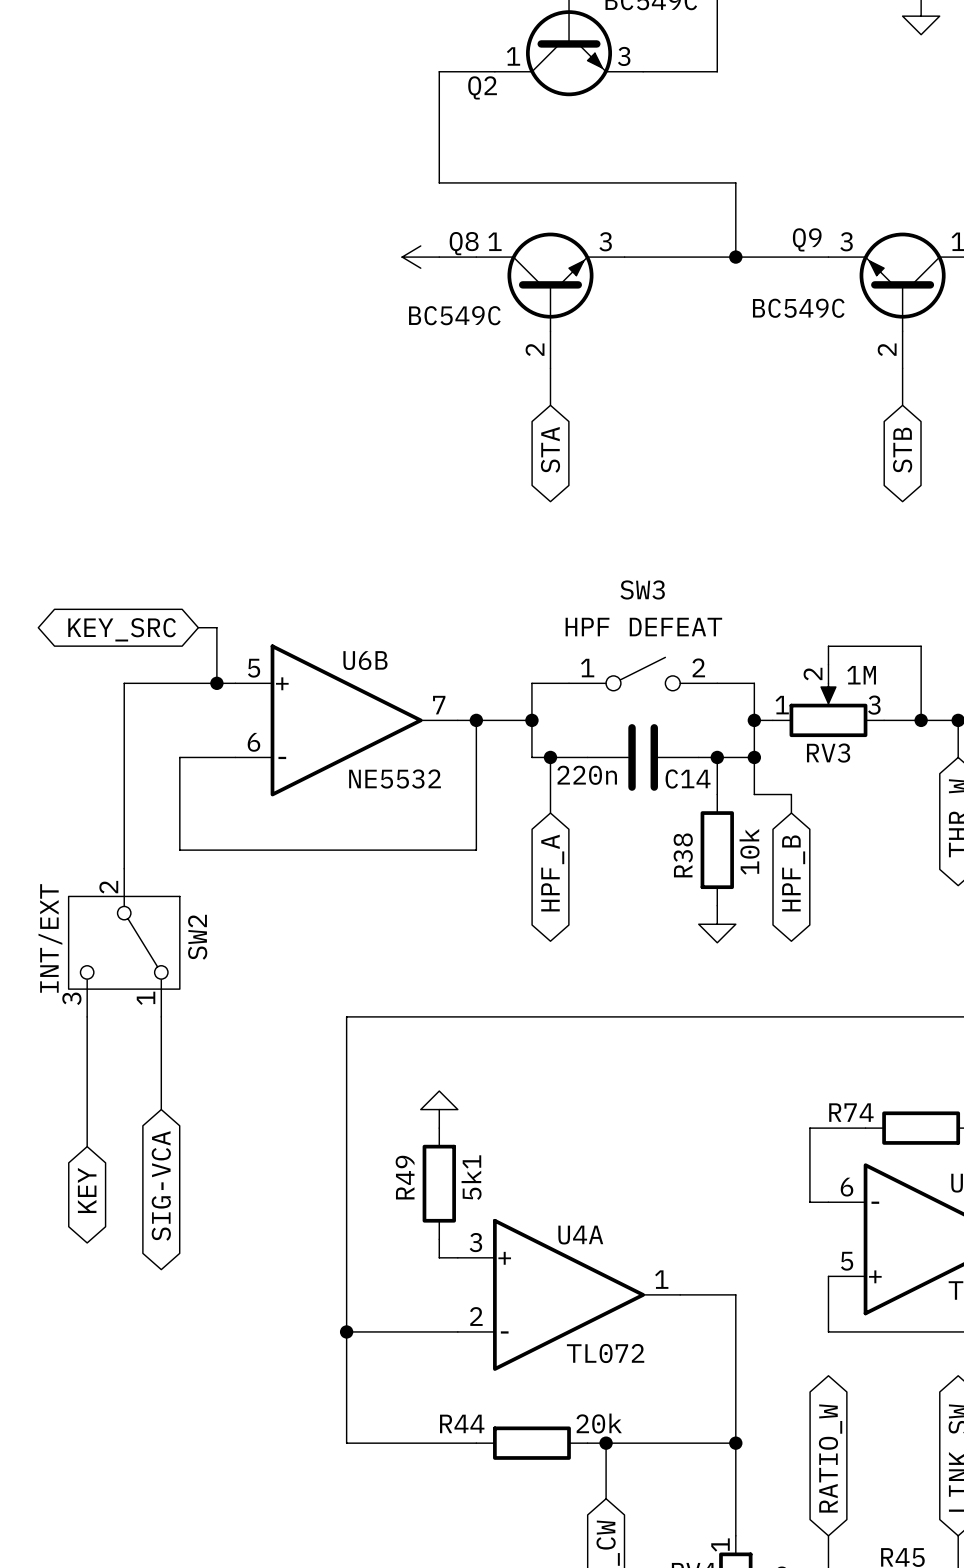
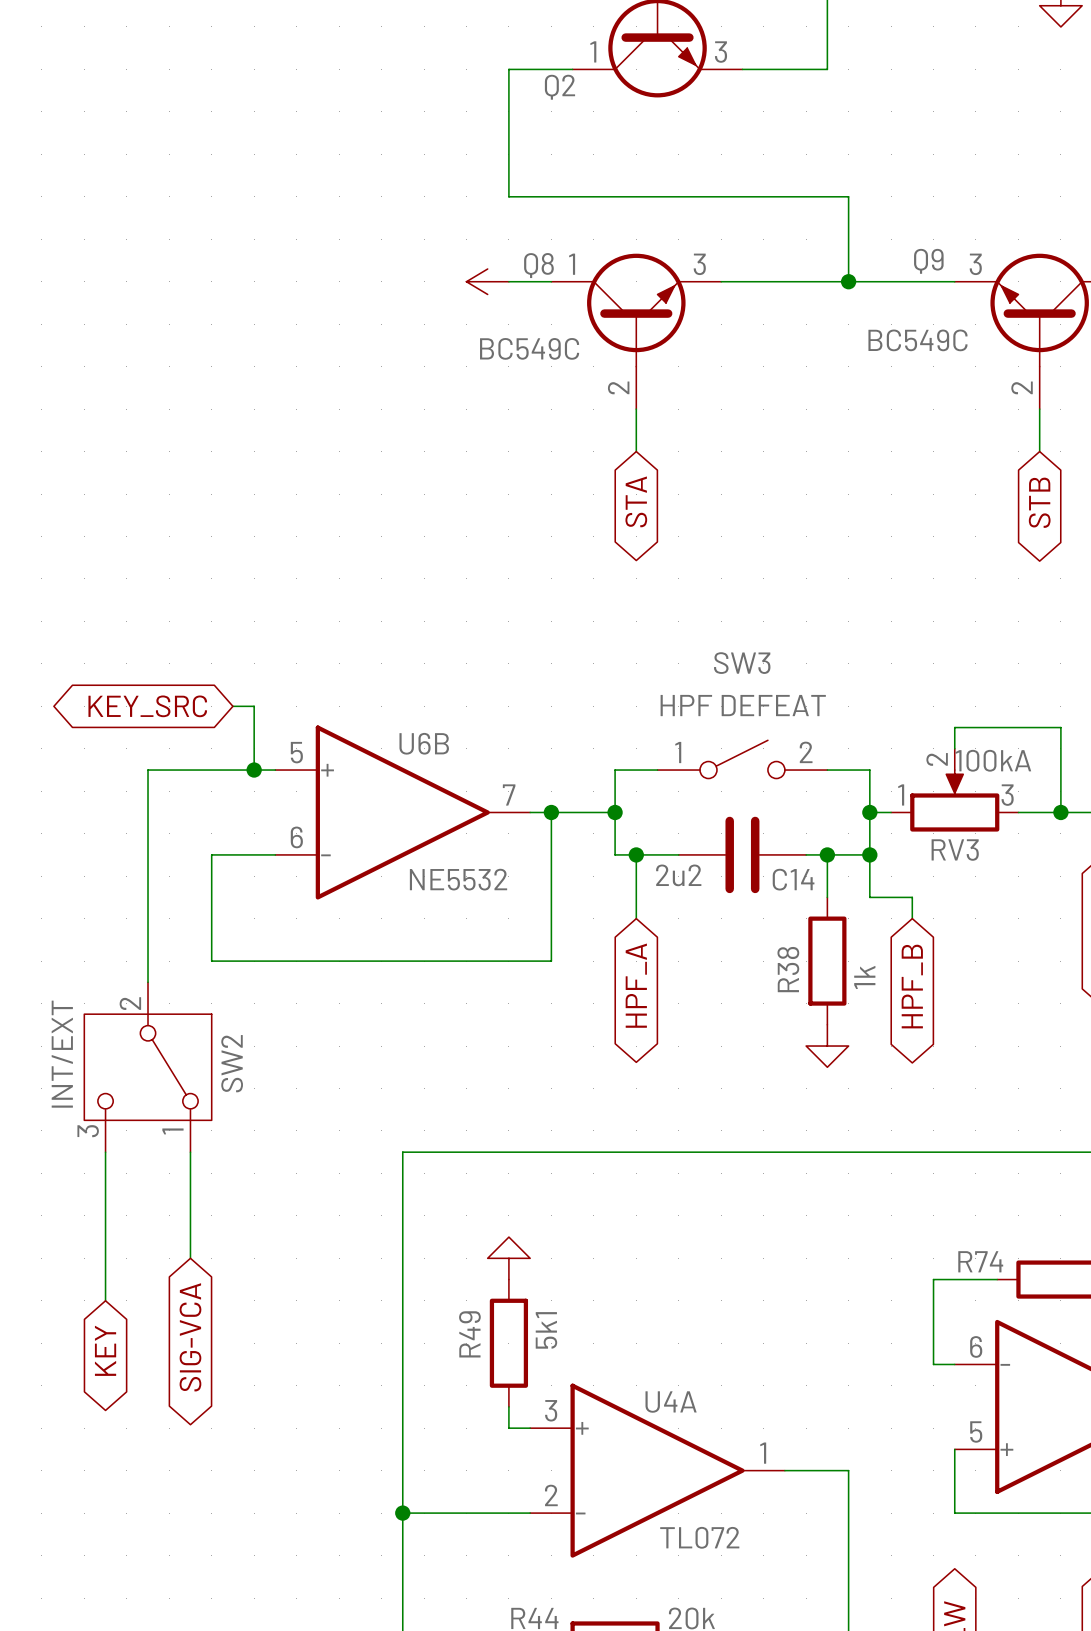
RV3 value: 1M (861, 675) -> 100kA (993, 760)
C14 value: 220n (587, 775) -> 2u2 (678, 875)
R38 value: 10k (749, 851) -> 1k (864, 977)

